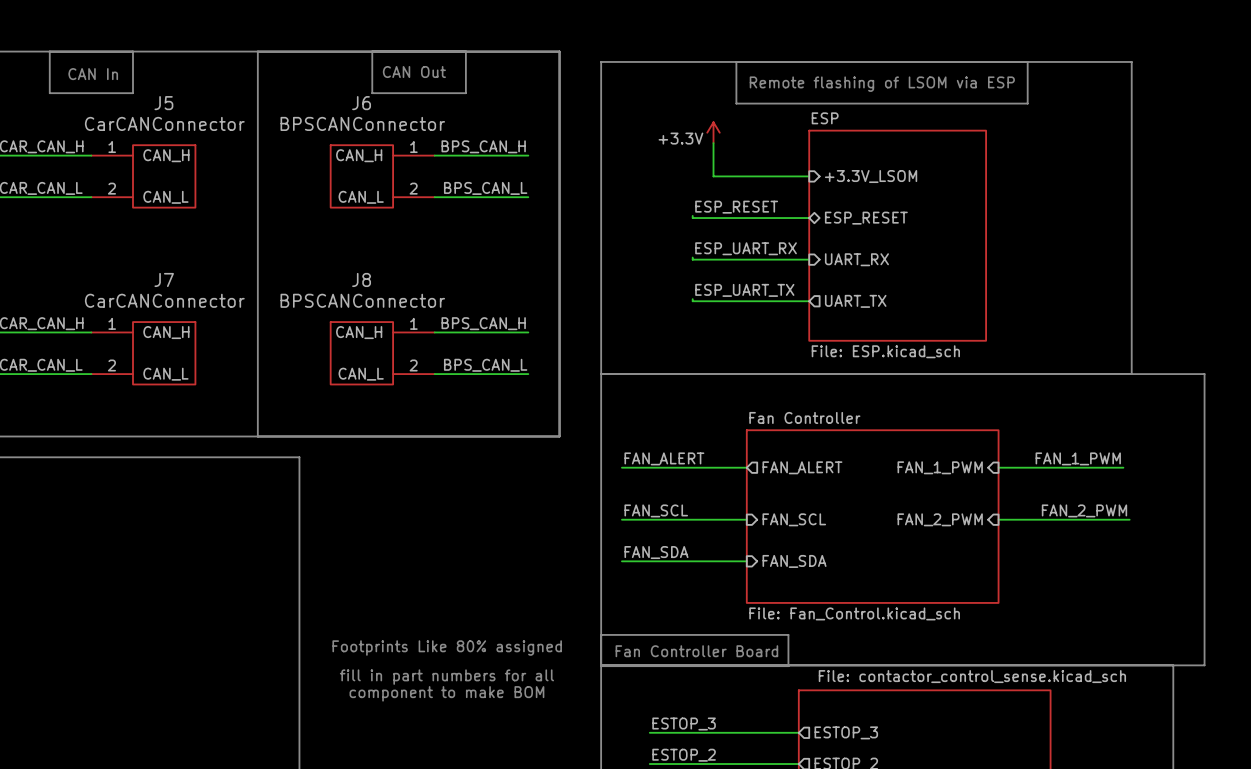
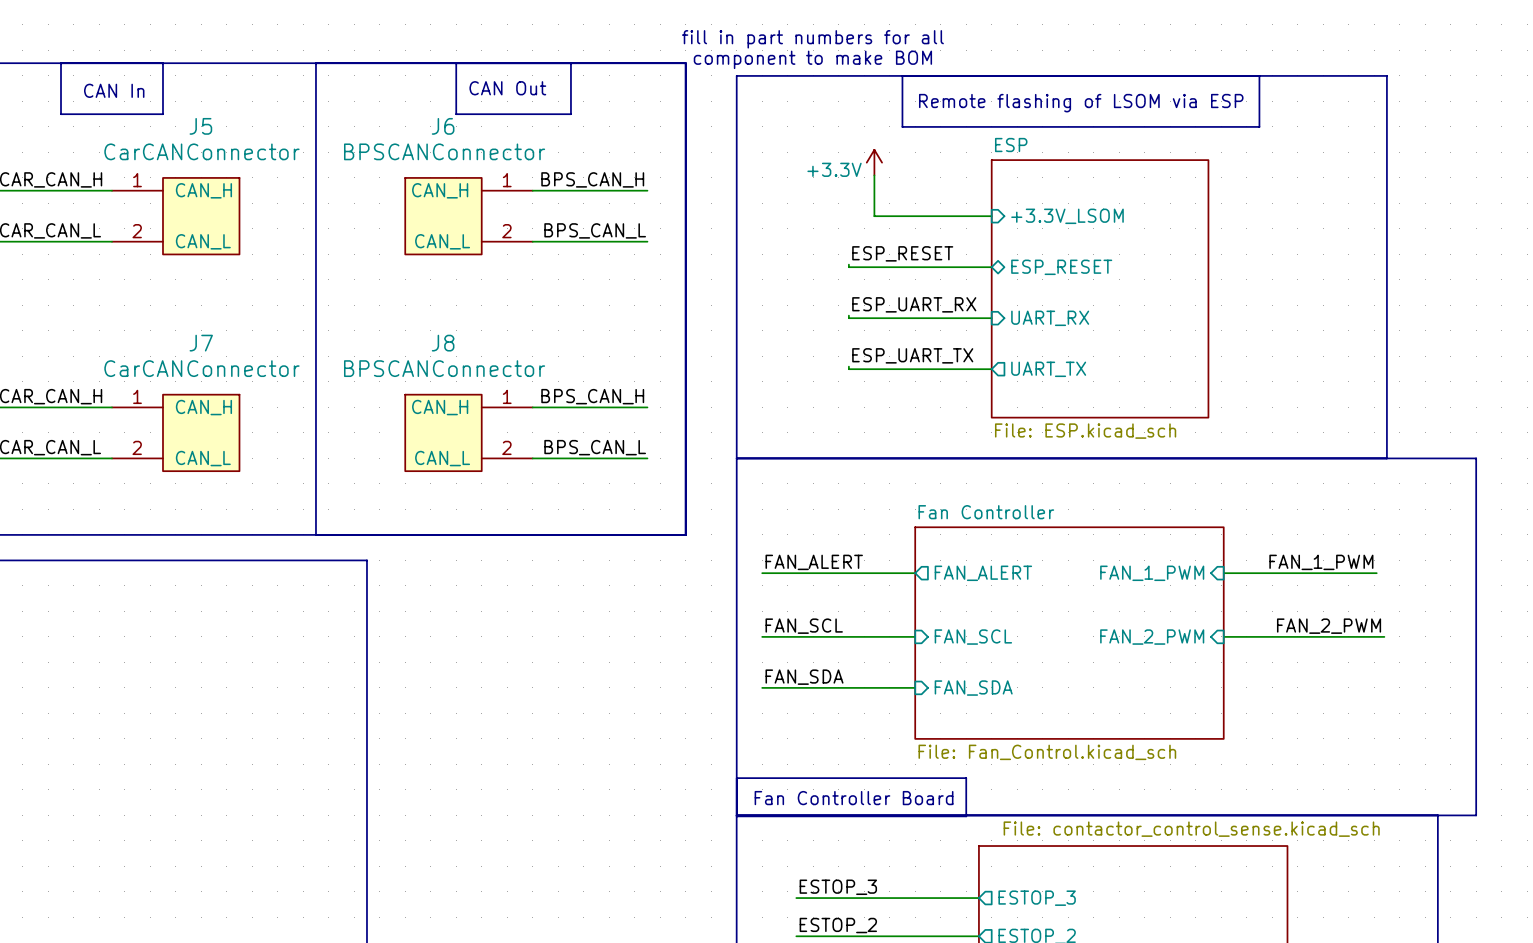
text: none -> fill in part numbers for all (812, 39)
text: none -> component to make BOM (812, 59)
text: Footprints Like 80% assigned (447, 648) -> none
text: fill in part numbers for all (446, 677) -> none
text: component to make BOM (446, 693) -> none

